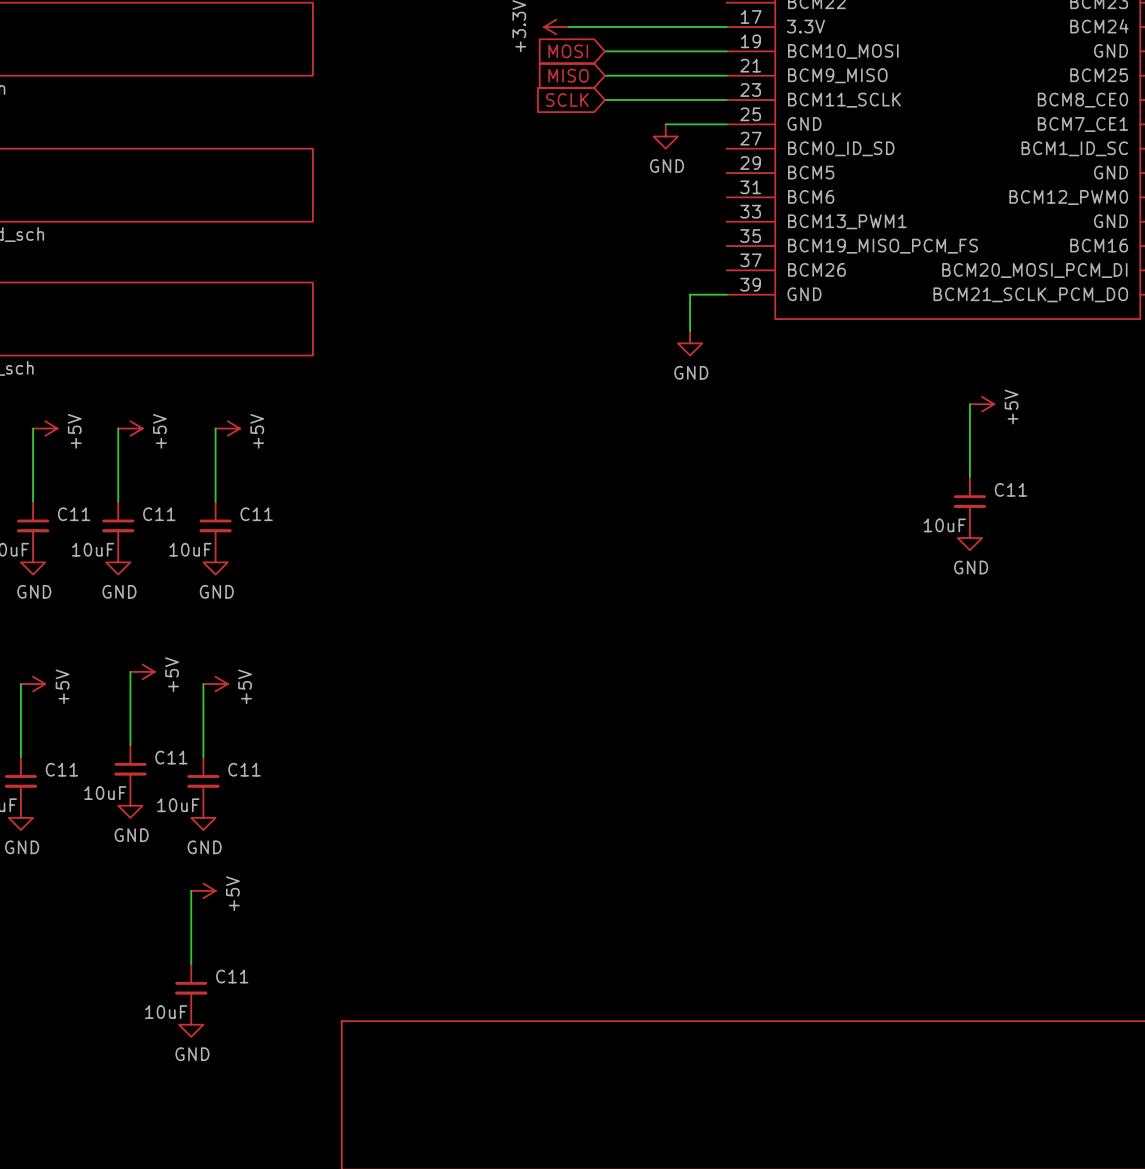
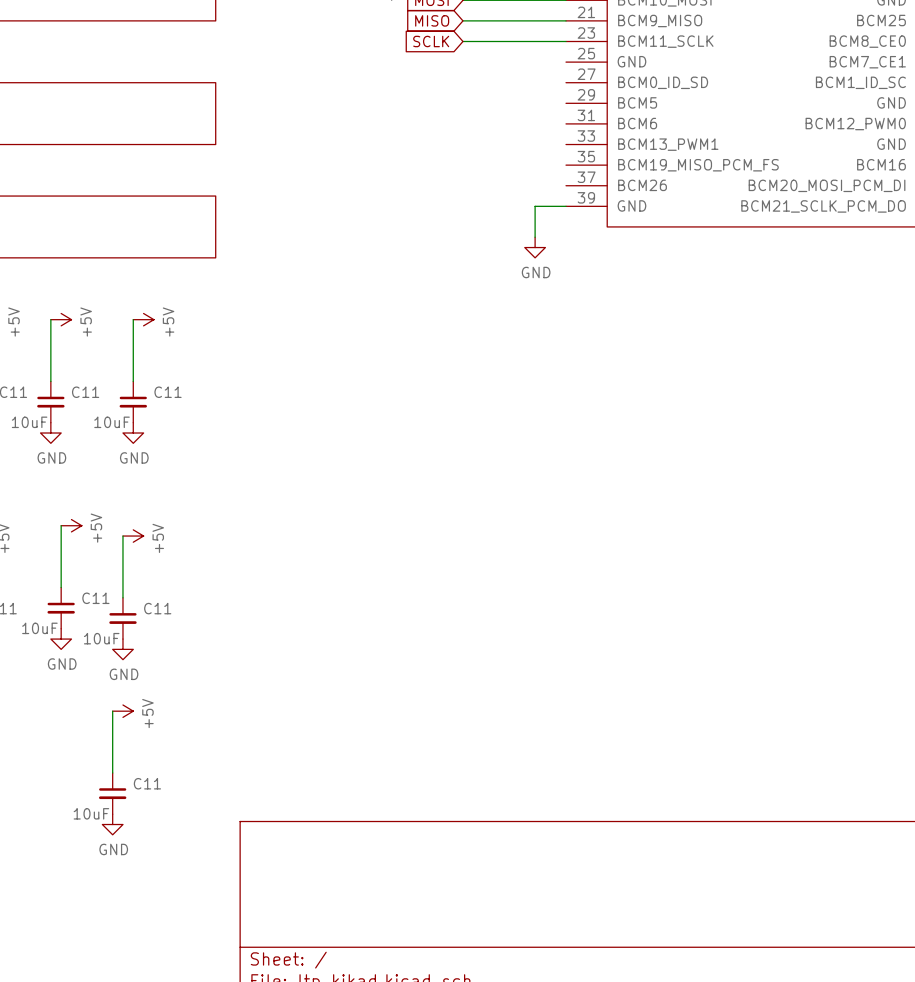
wire: (665, 124) (726, 124) -> none
power symbol: GND (665, 136) -> none
wire: (969, 404) (969, 477) -> none
power symbol: +5V (982, 404) -> none
C11: 10uF (969, 501) -> none
power symbol: GND (969, 538) -> none

